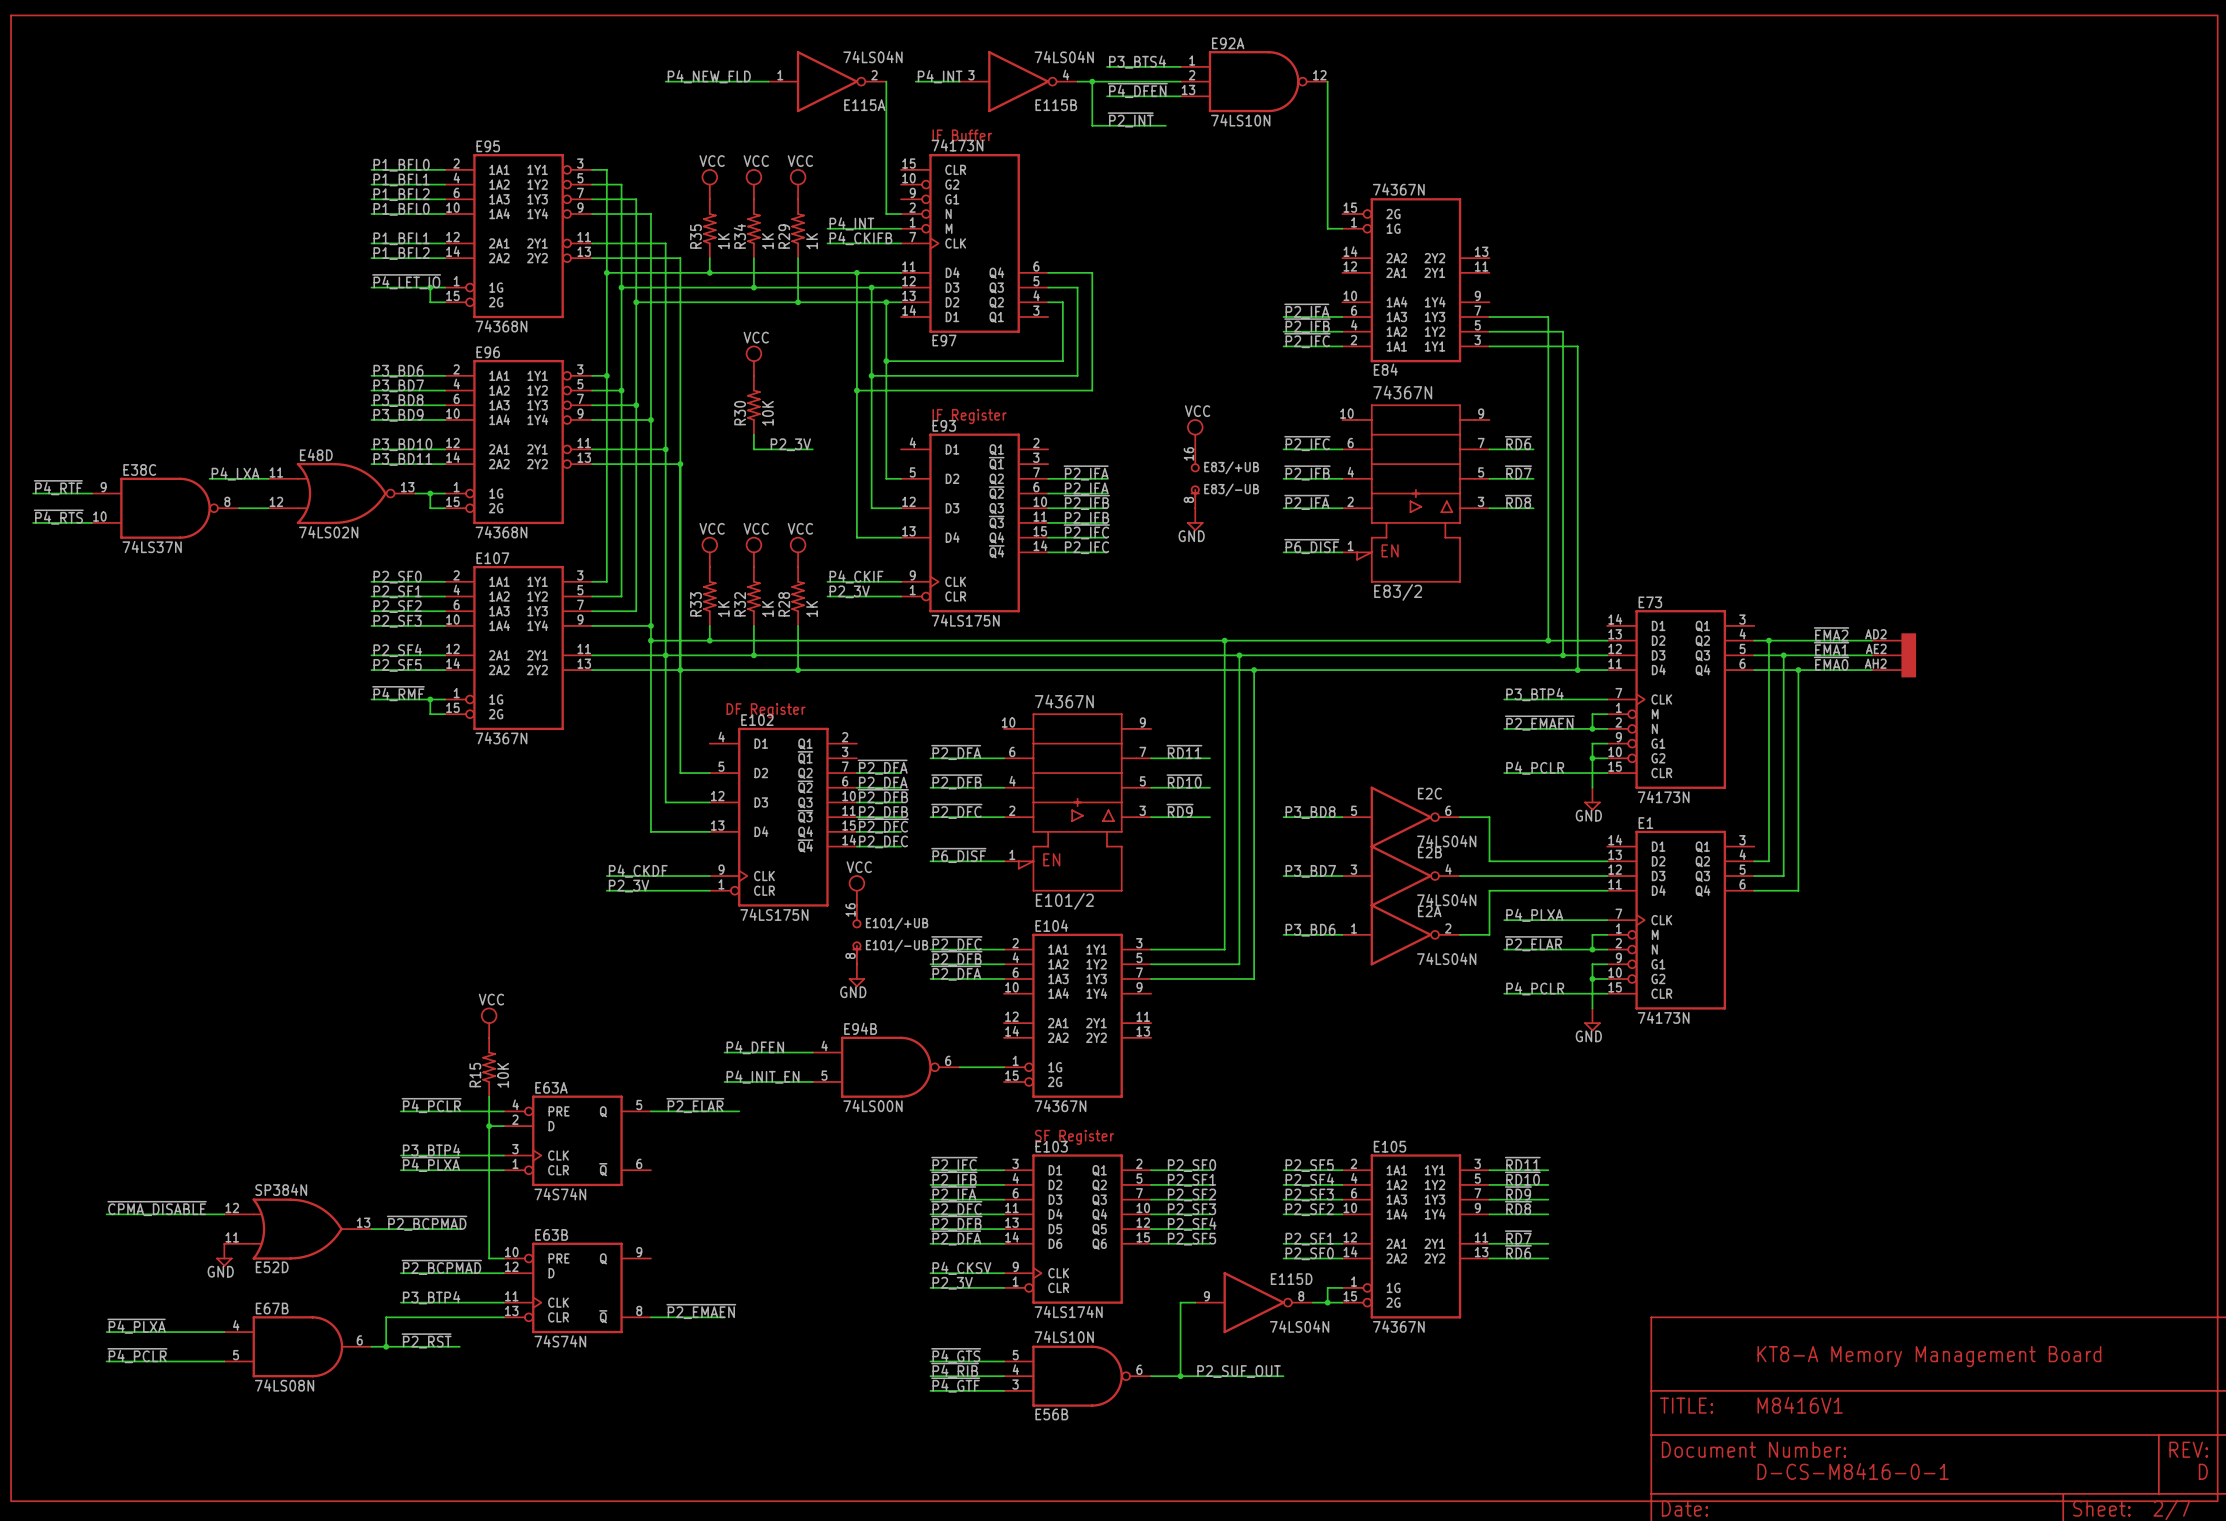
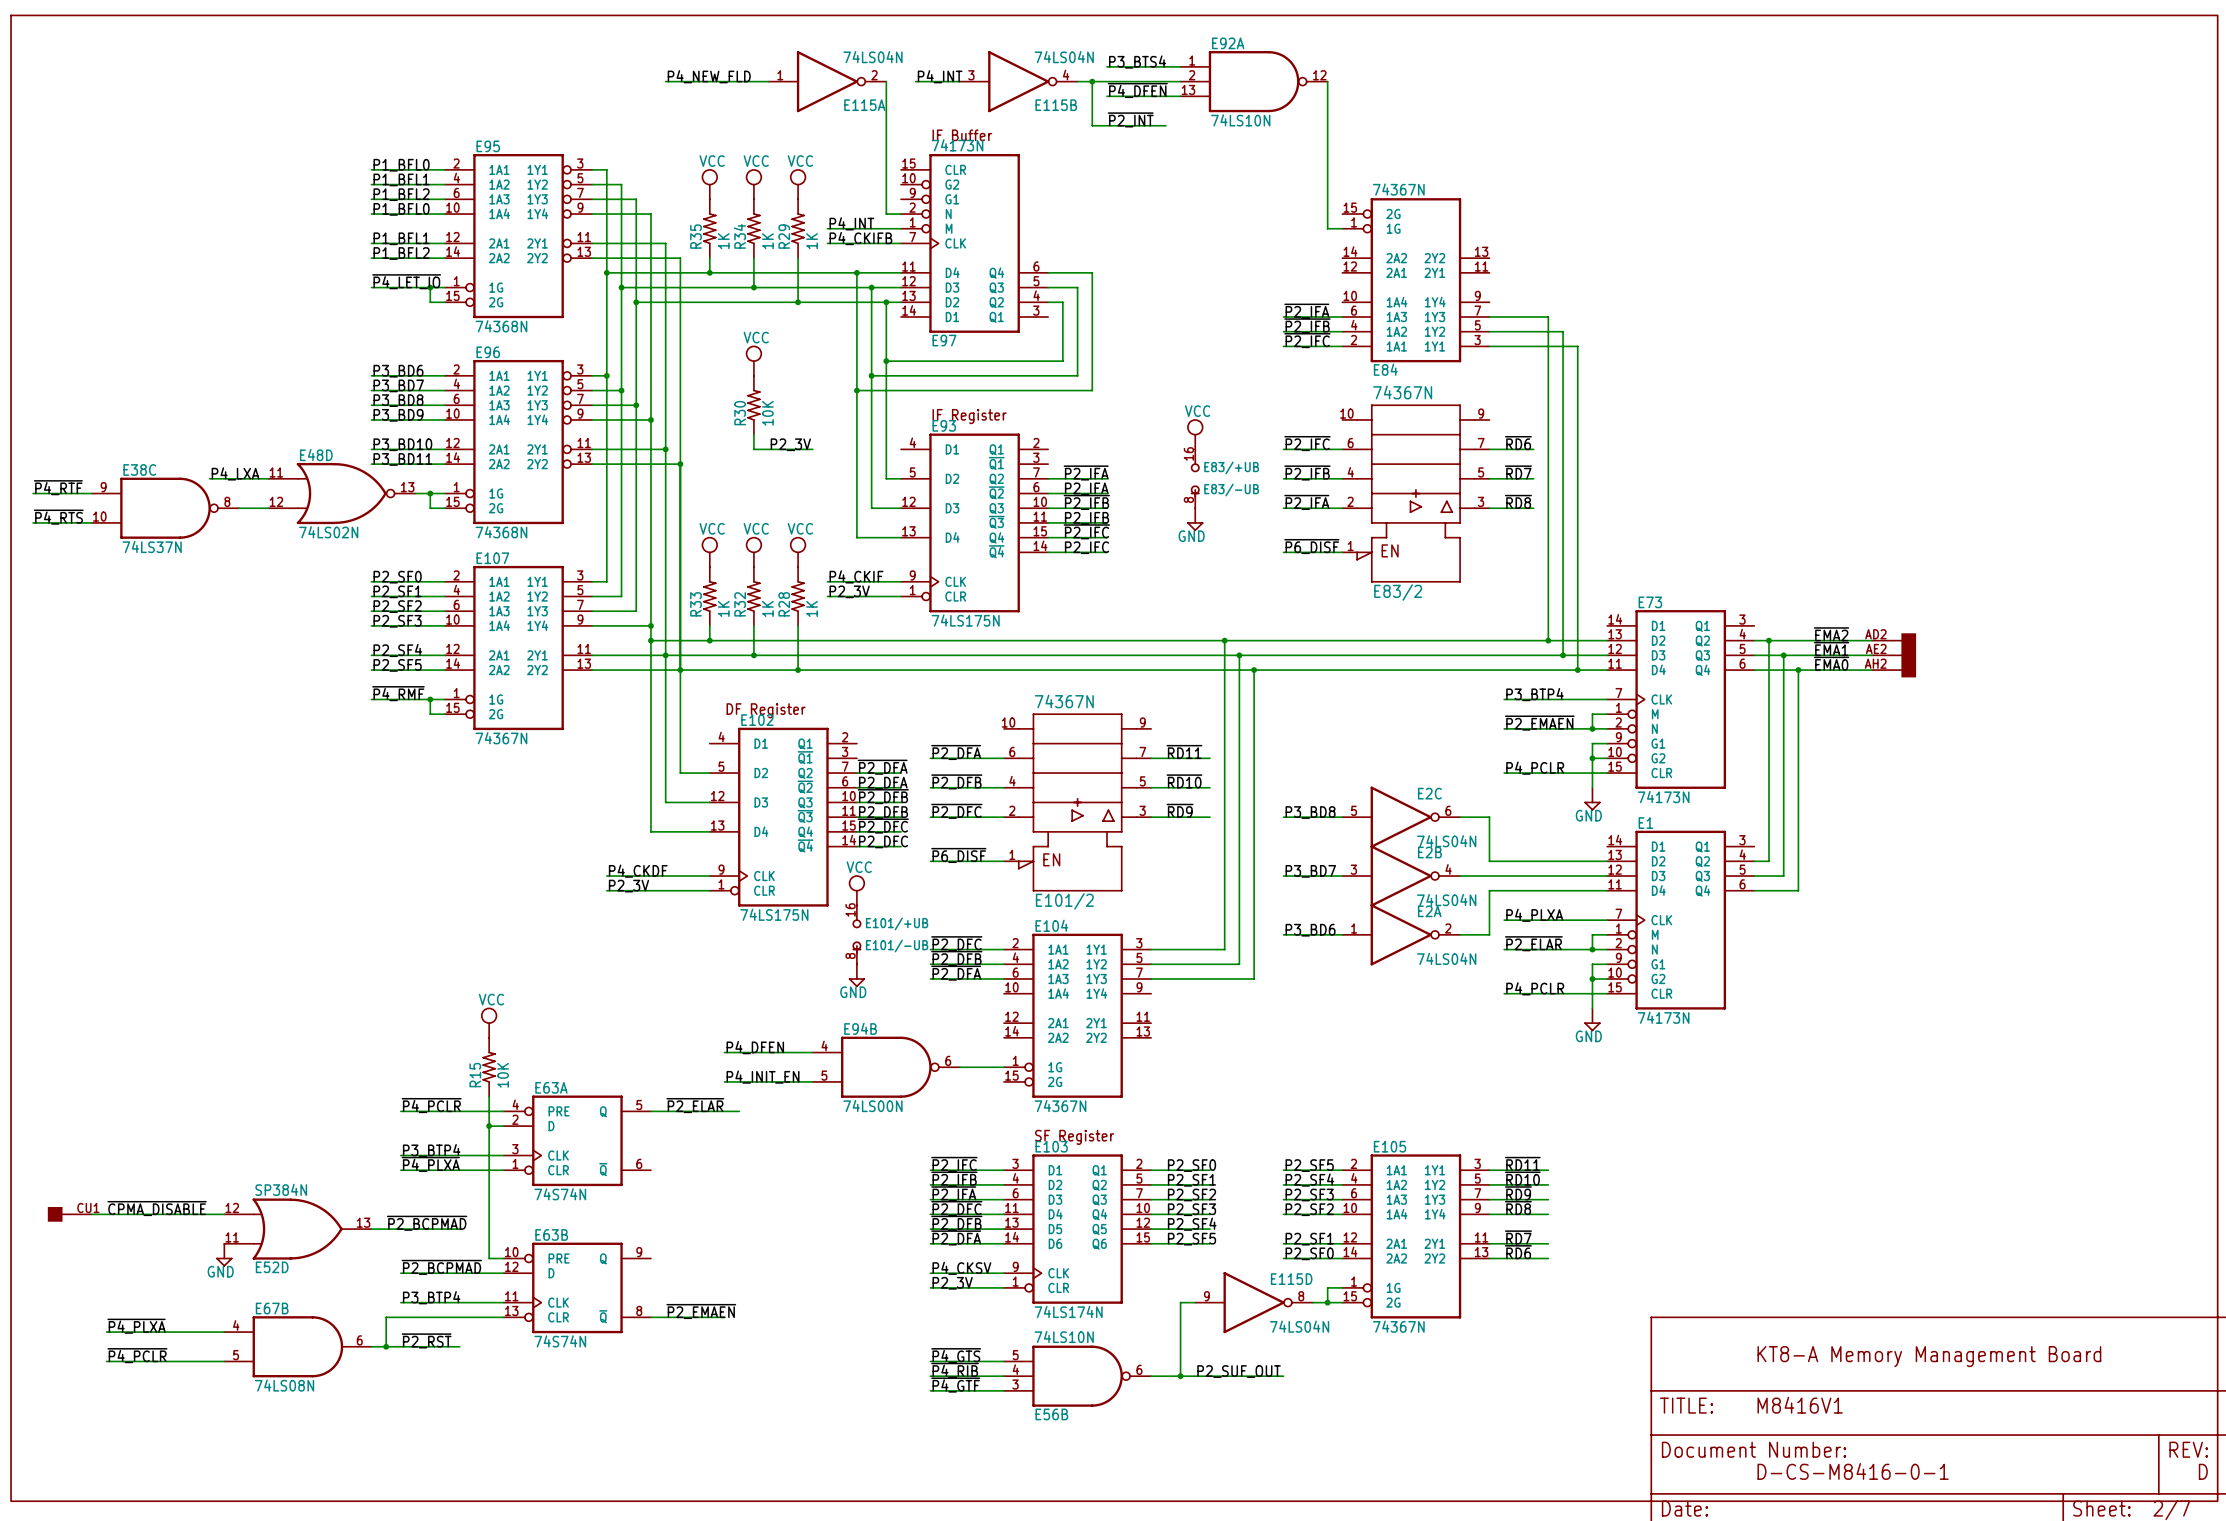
part: none -> (69, 1214)
wire: none -> (91, 1214) (106, 1214)

